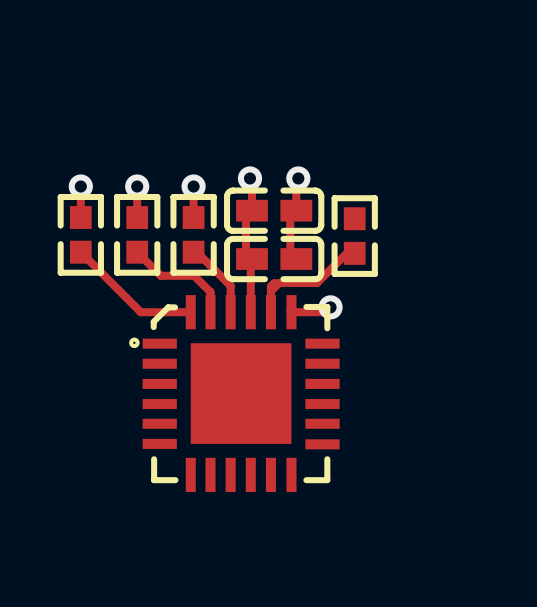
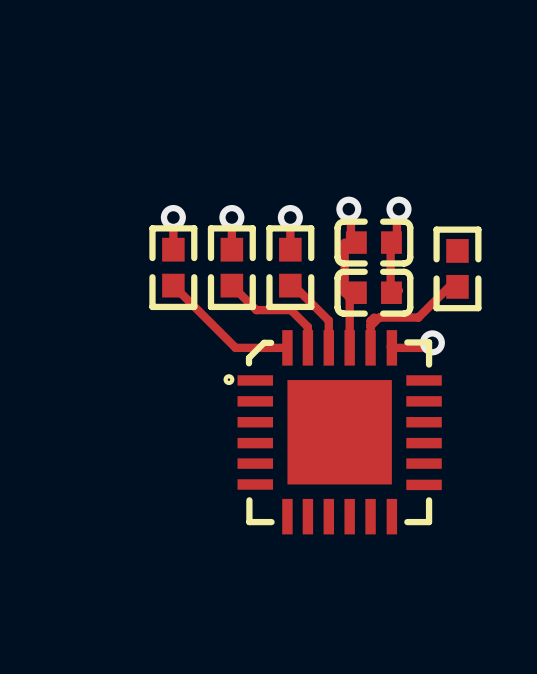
part footprint: [224, 187, 325, 234] -> [334, 218, 414, 267]
part footprint: [224, 235, 325, 283] -> [334, 268, 414, 317]

